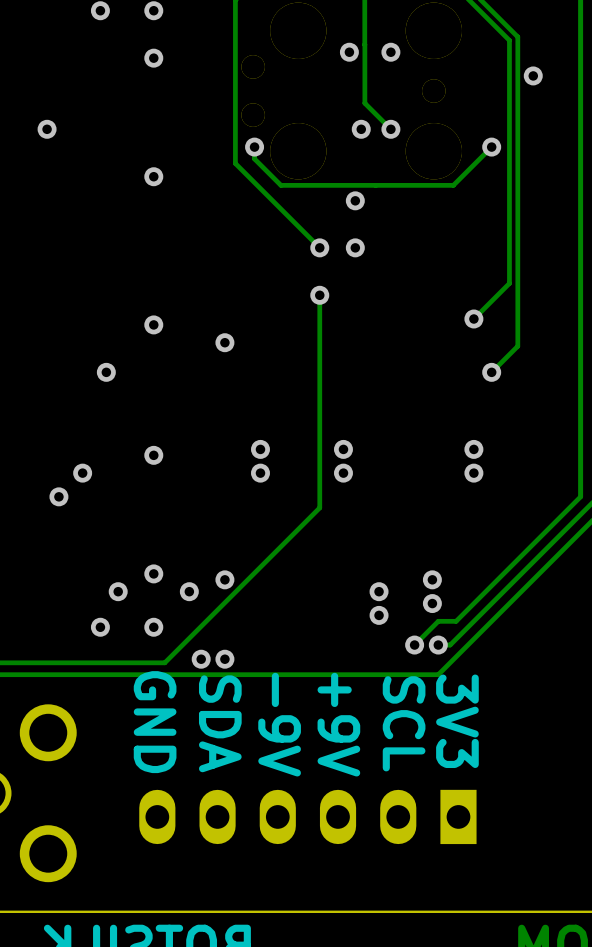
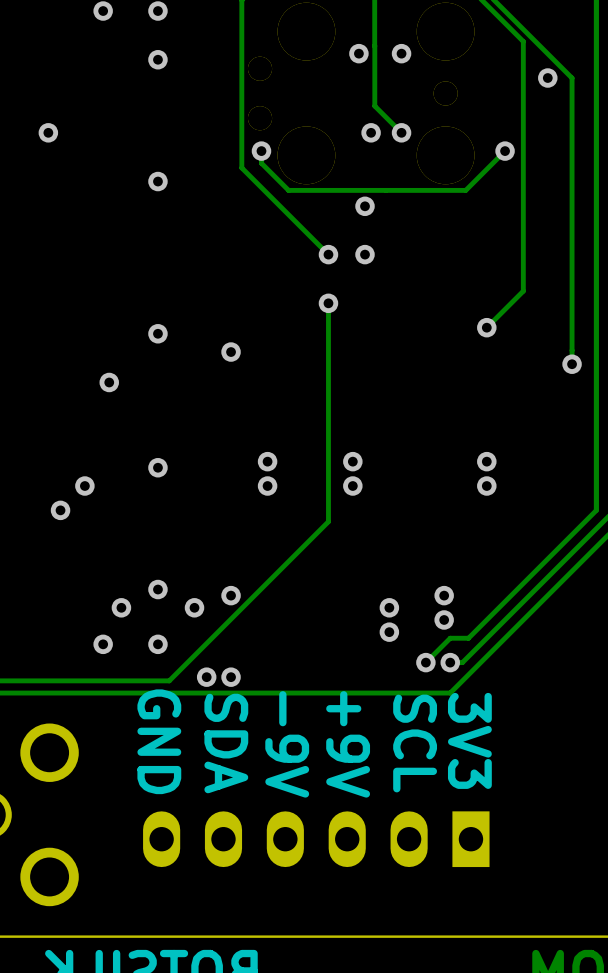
track: (517, 36) (517, 346) (491, 372) -> (531, 37) (572, 78) (572, 364)
via position: (491, 372) -> (572, 364)

